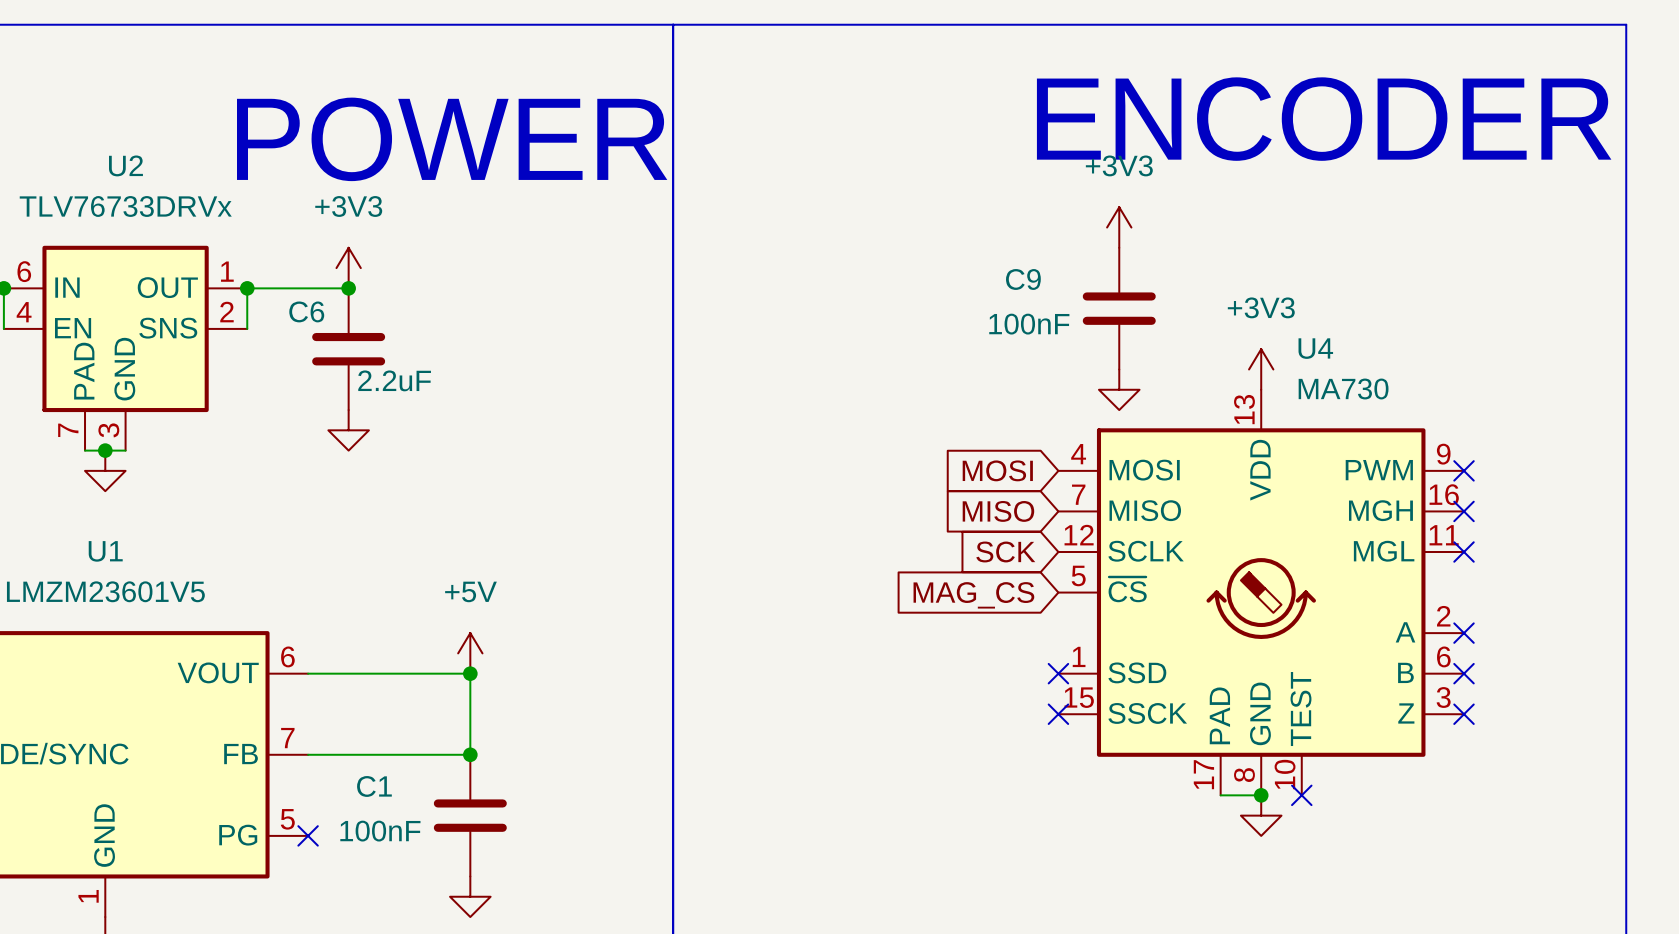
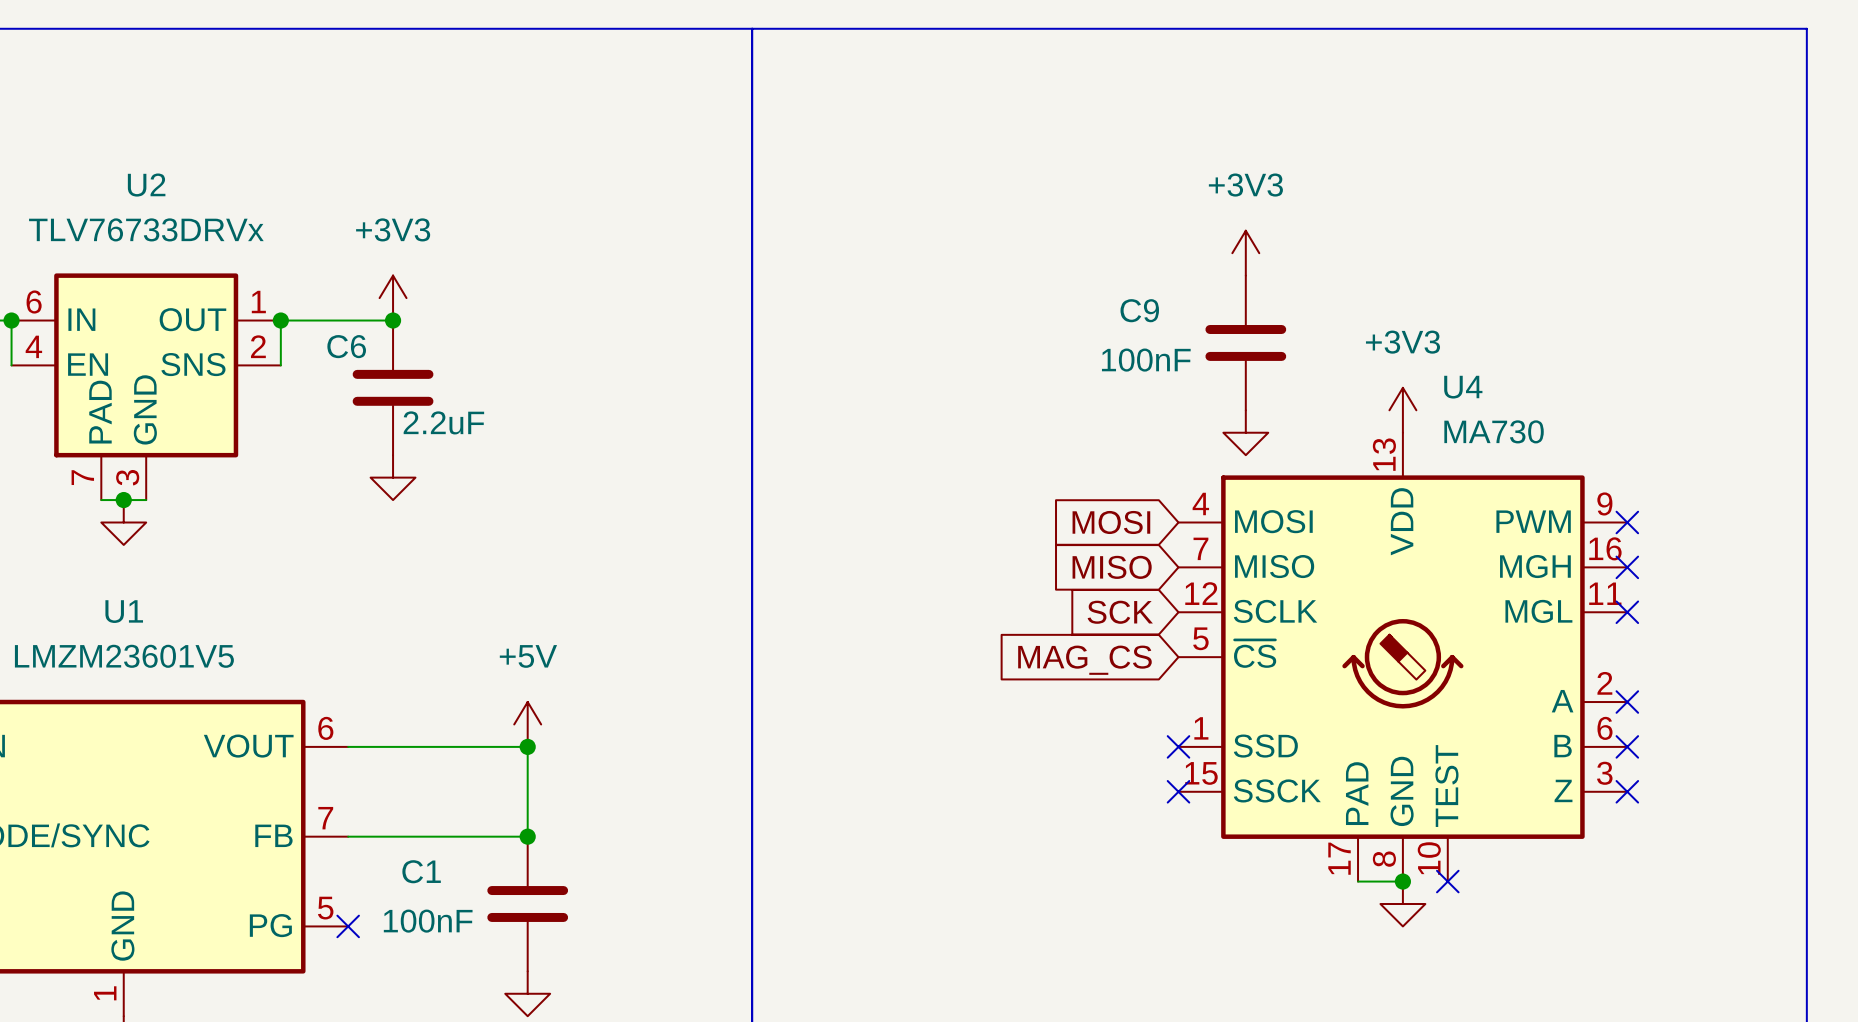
text: ENCODER (1324, 119) -> none
text: POWER (452, 139) -> none

